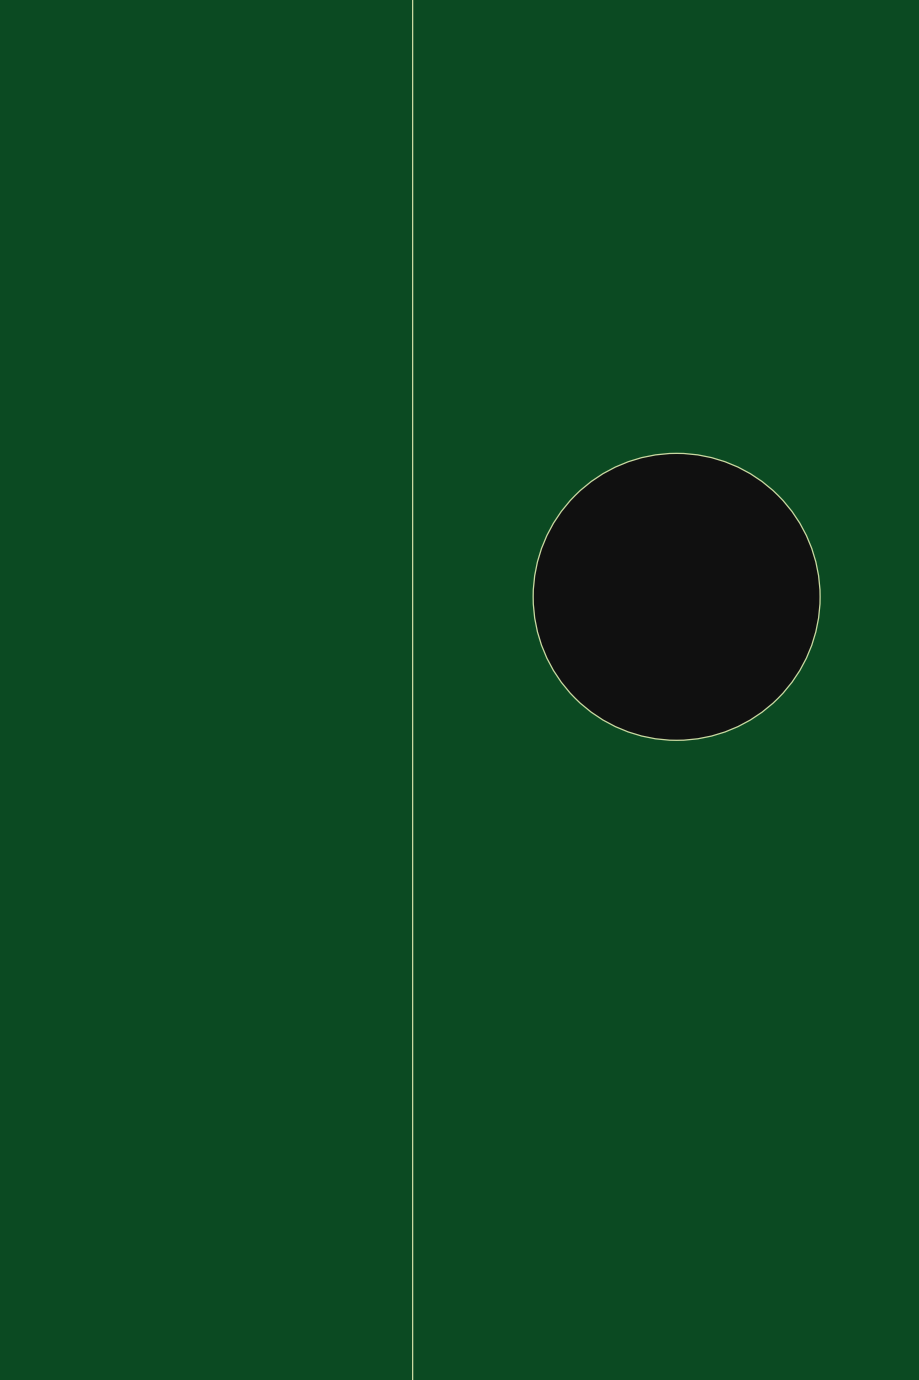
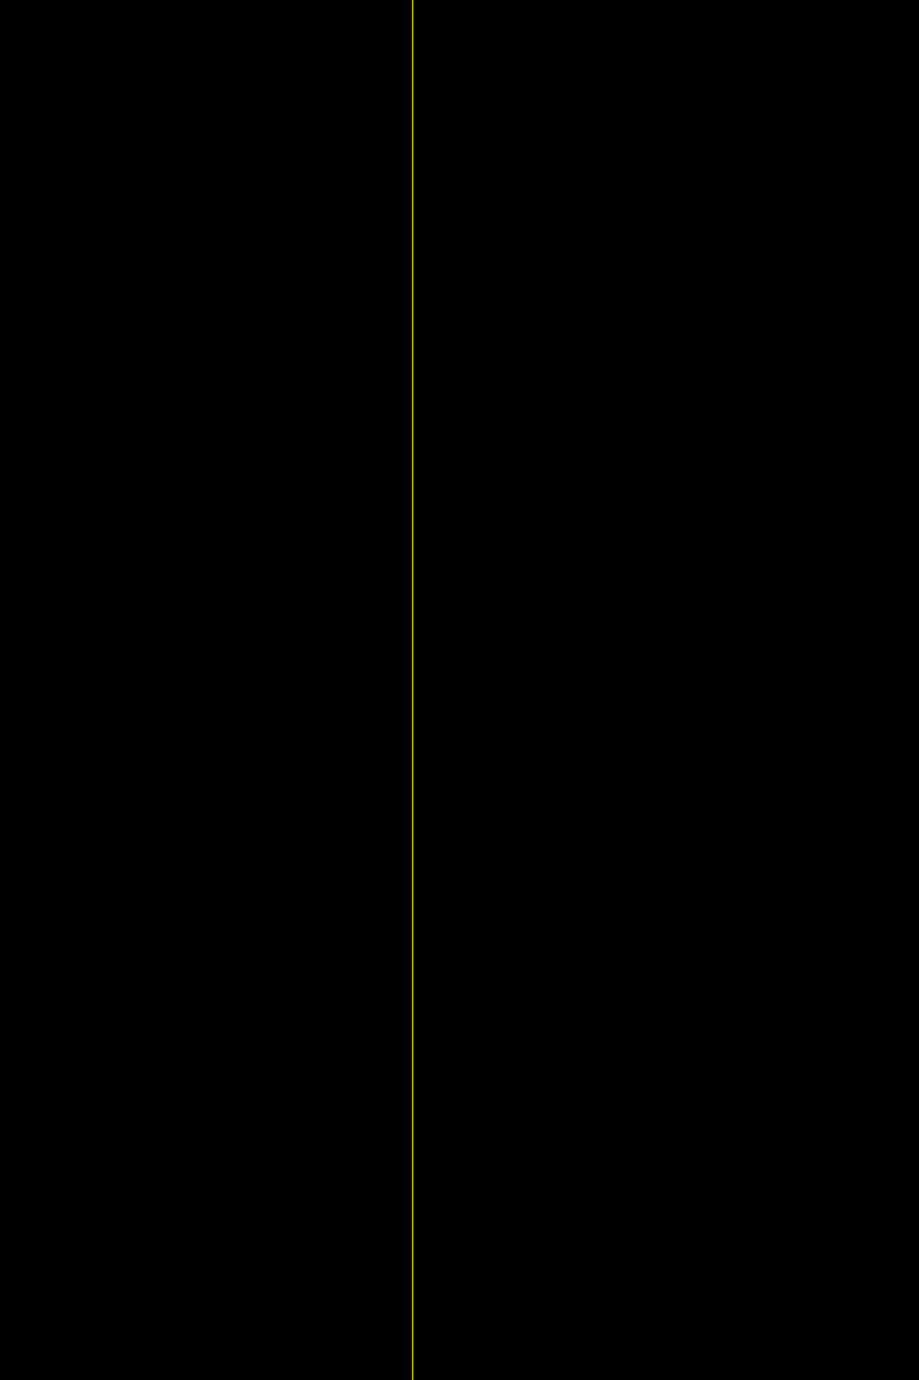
part: (676, 596) -> none

